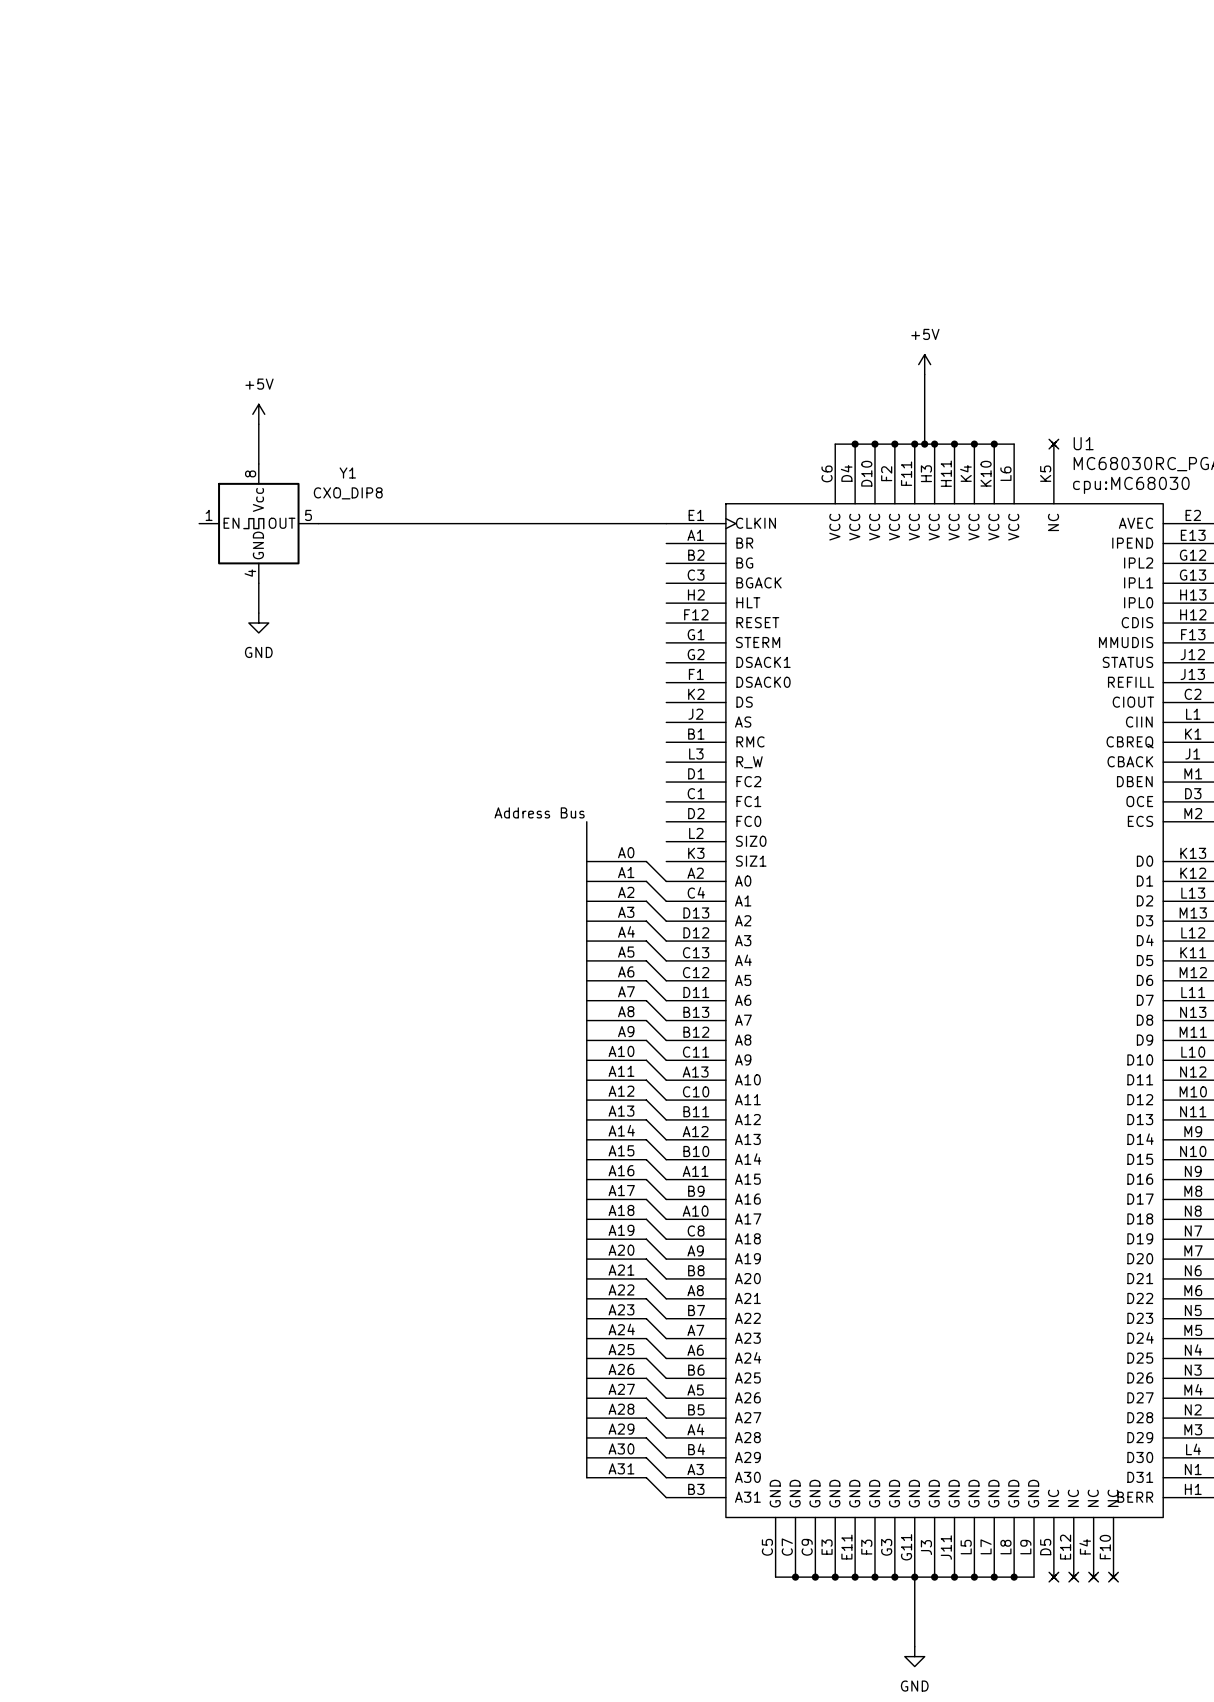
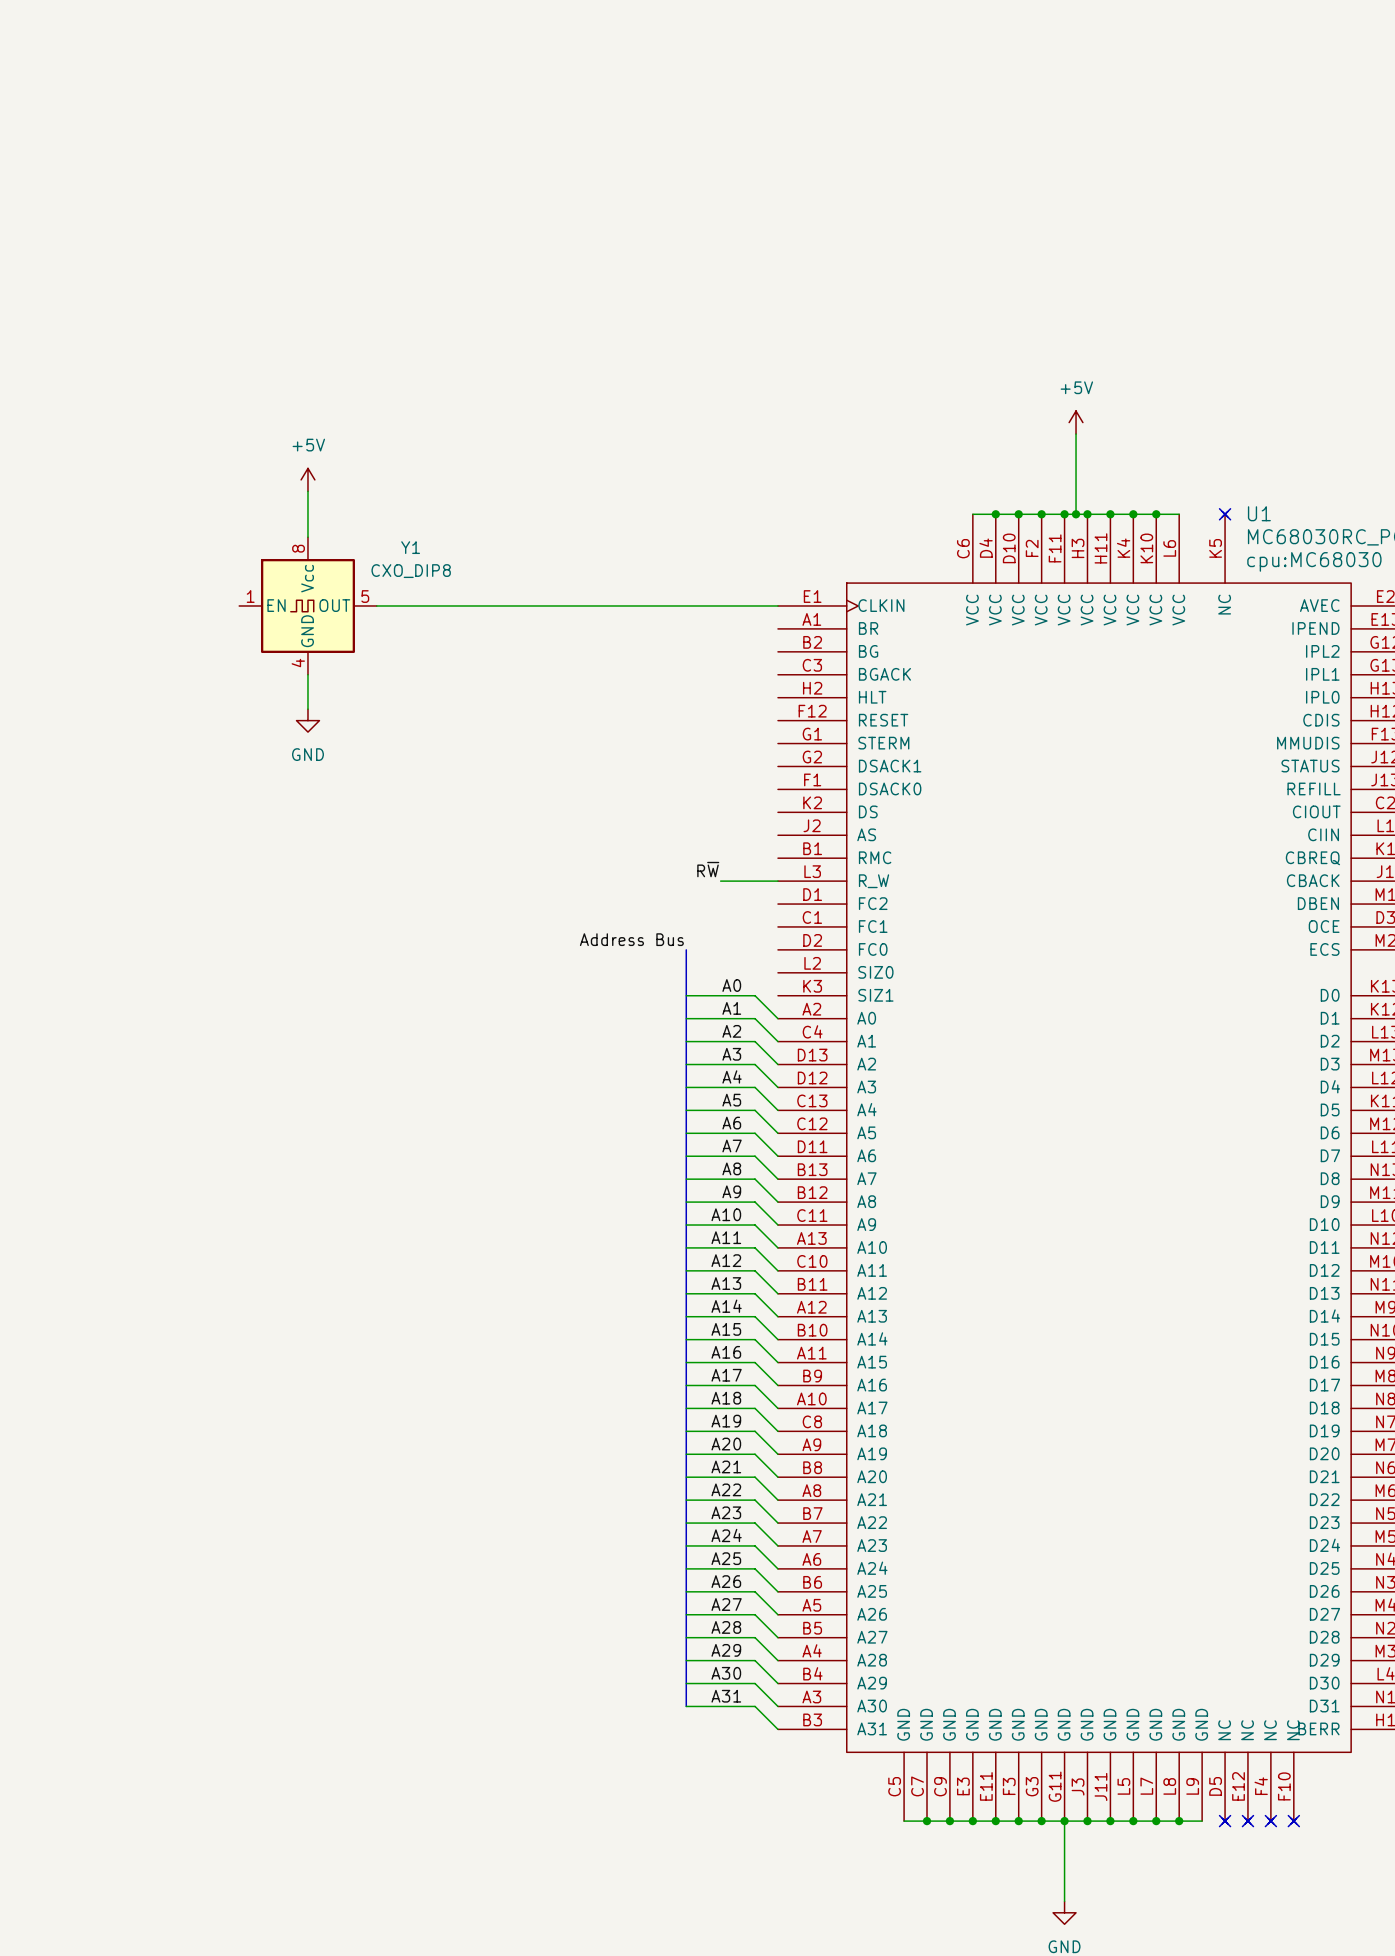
label: none -> R~{W} (708, 869)
wire: none -> (720, 881) (777, 881)

